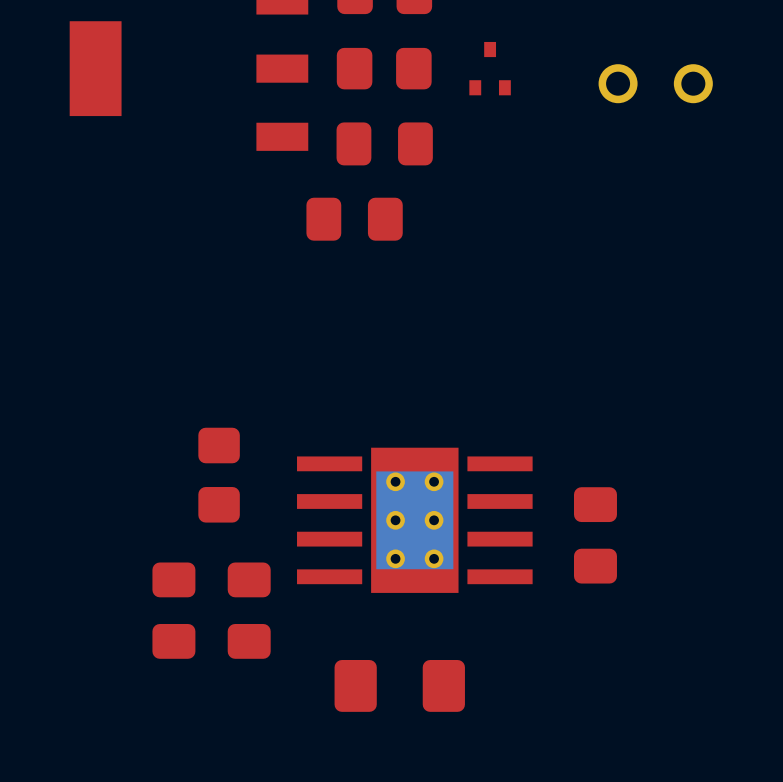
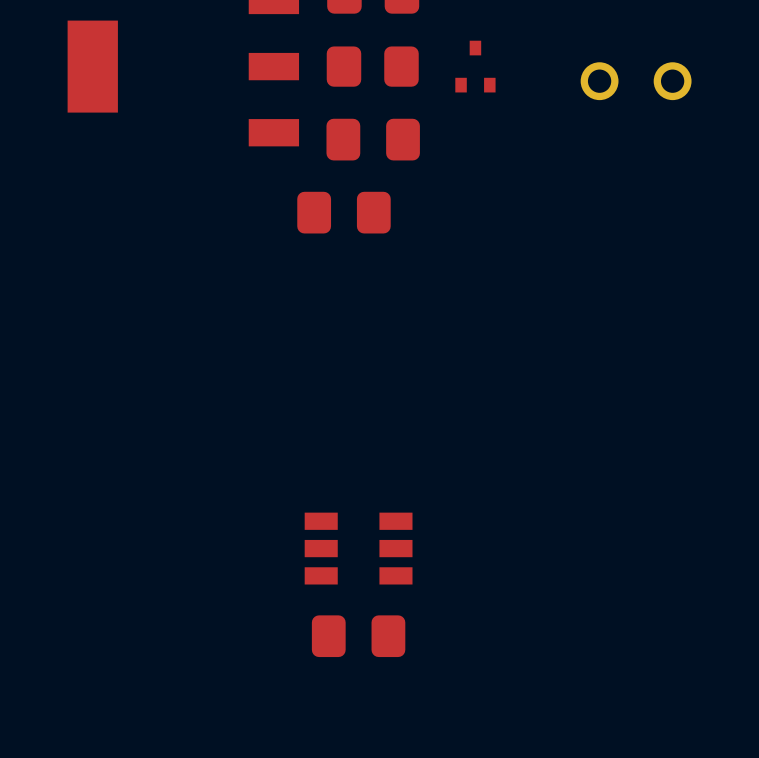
part: (219, 475) -> none
part: (414, 520) -> none
part: (595, 535) -> none
part: none -> (358, 548)
part: (173, 610) -> none
part: (249, 610) -> none
part: none -> (358, 636)
part: (399, 685) -> none

